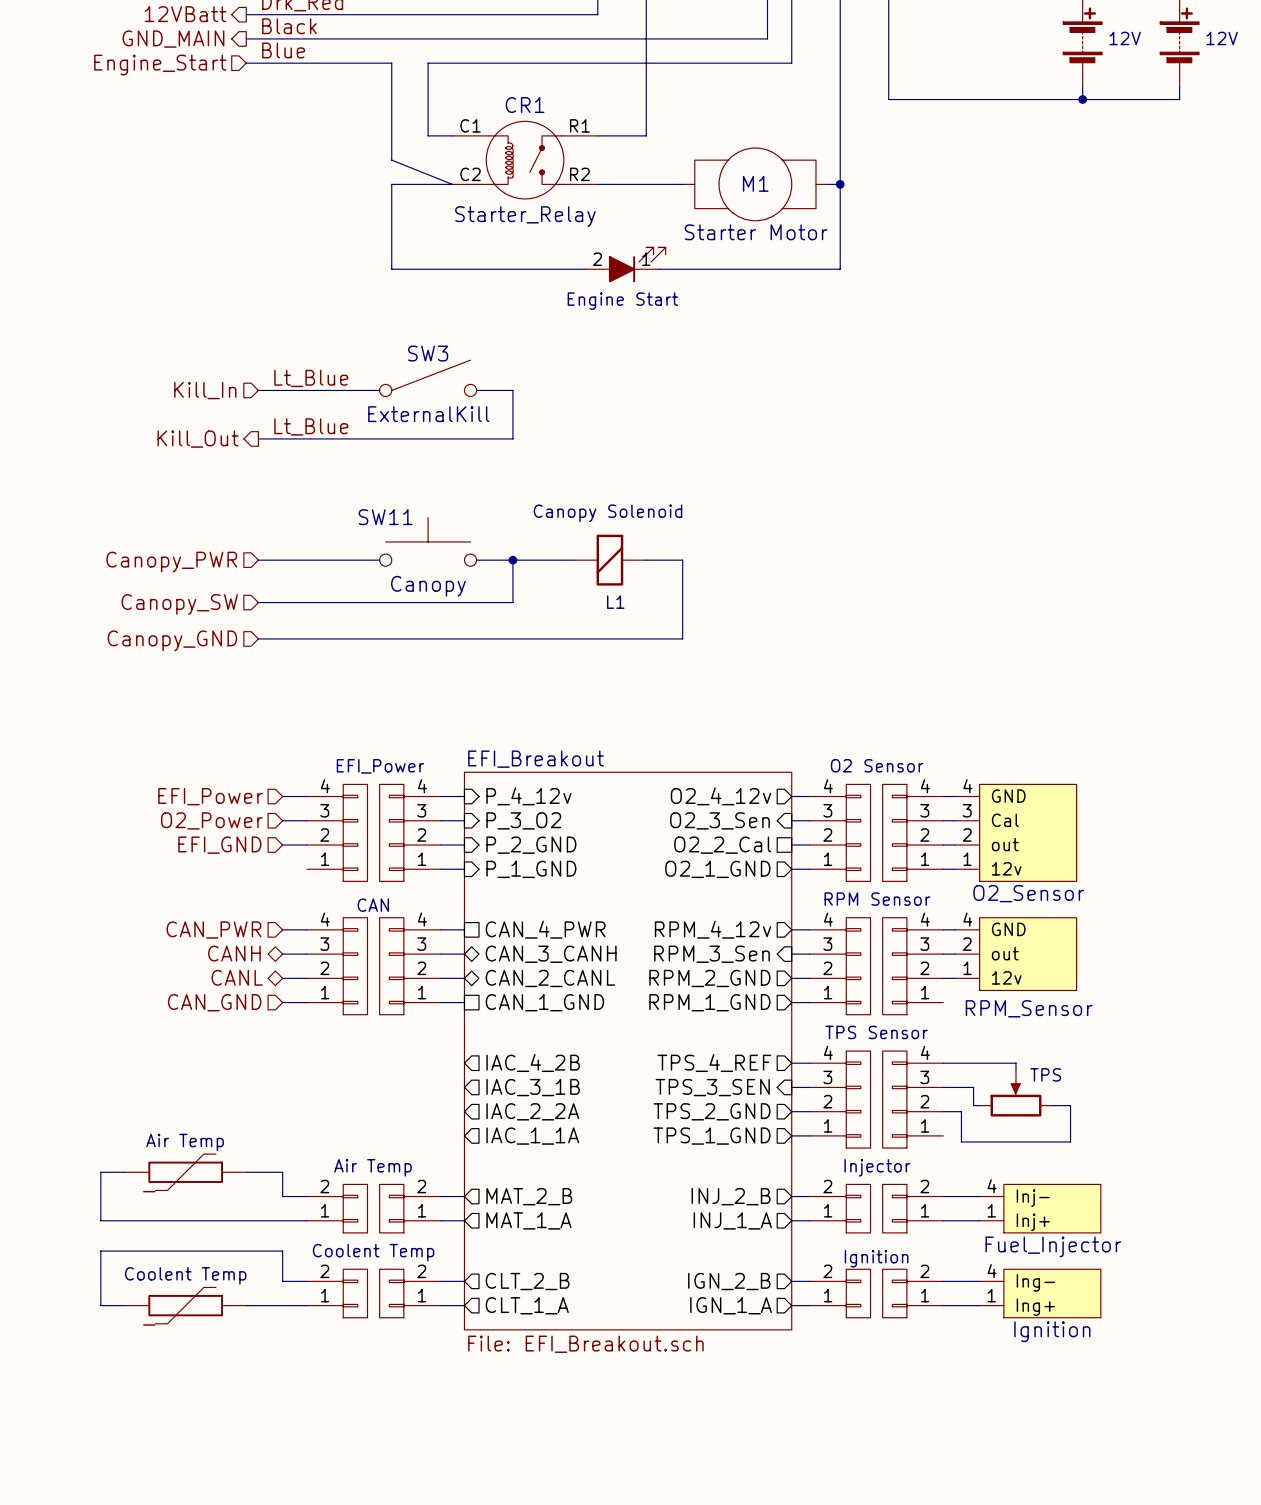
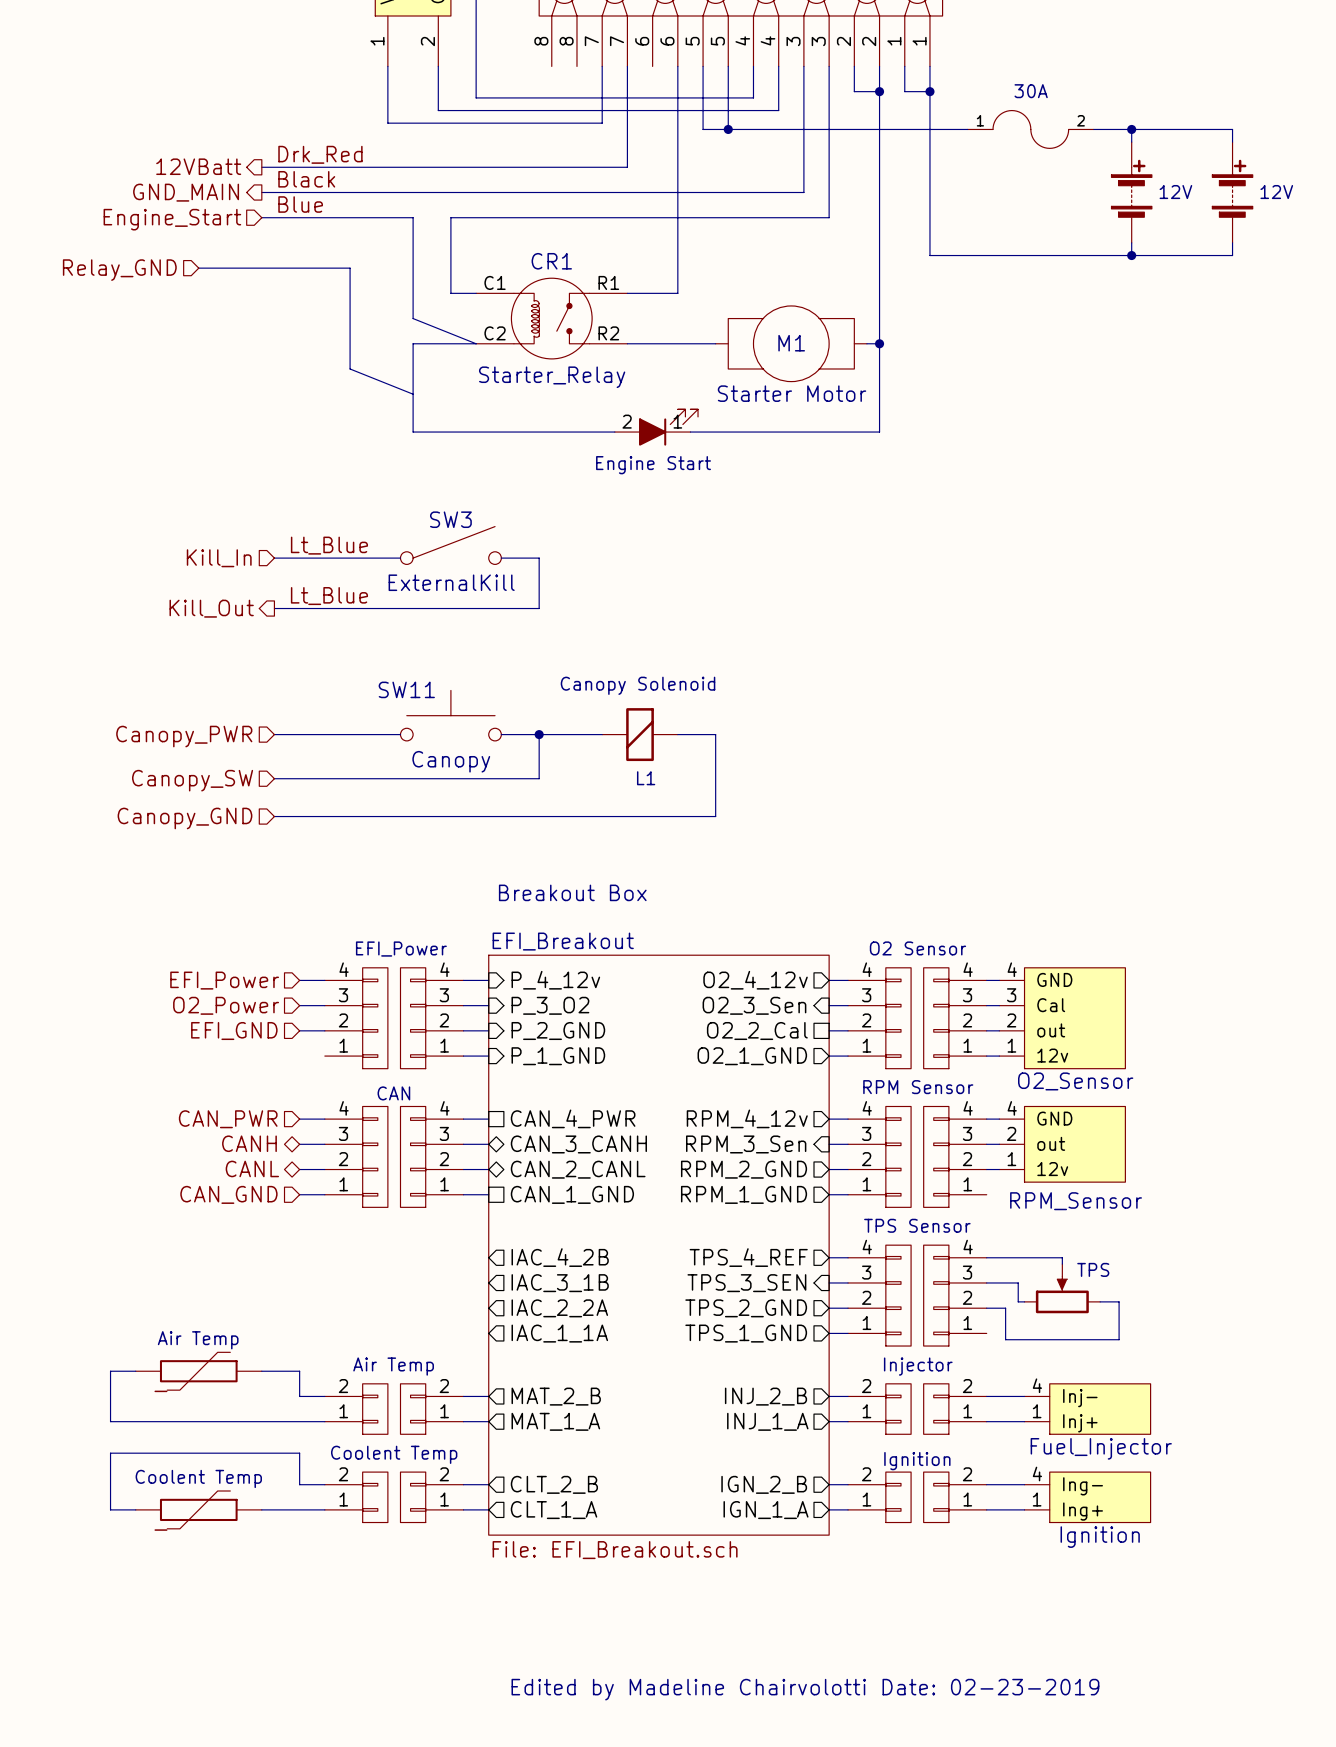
wire: none -> (198, 268) (350, 268) (350, 368) (413, 394)
hierarchical label: none -> Relay_GND (119, 270)
text: none -> Breakout Box (572, 892)
text: none -> Edited by Madeline Chairvolotti Date: 02-23-2019 (805, 1689)

